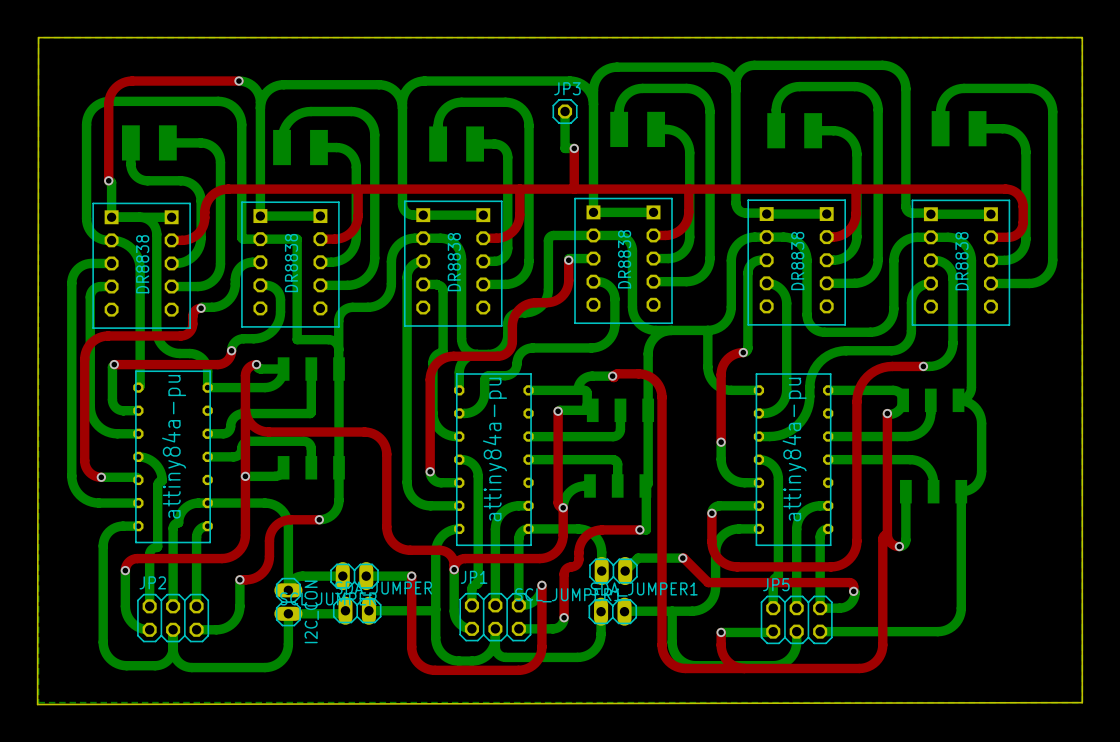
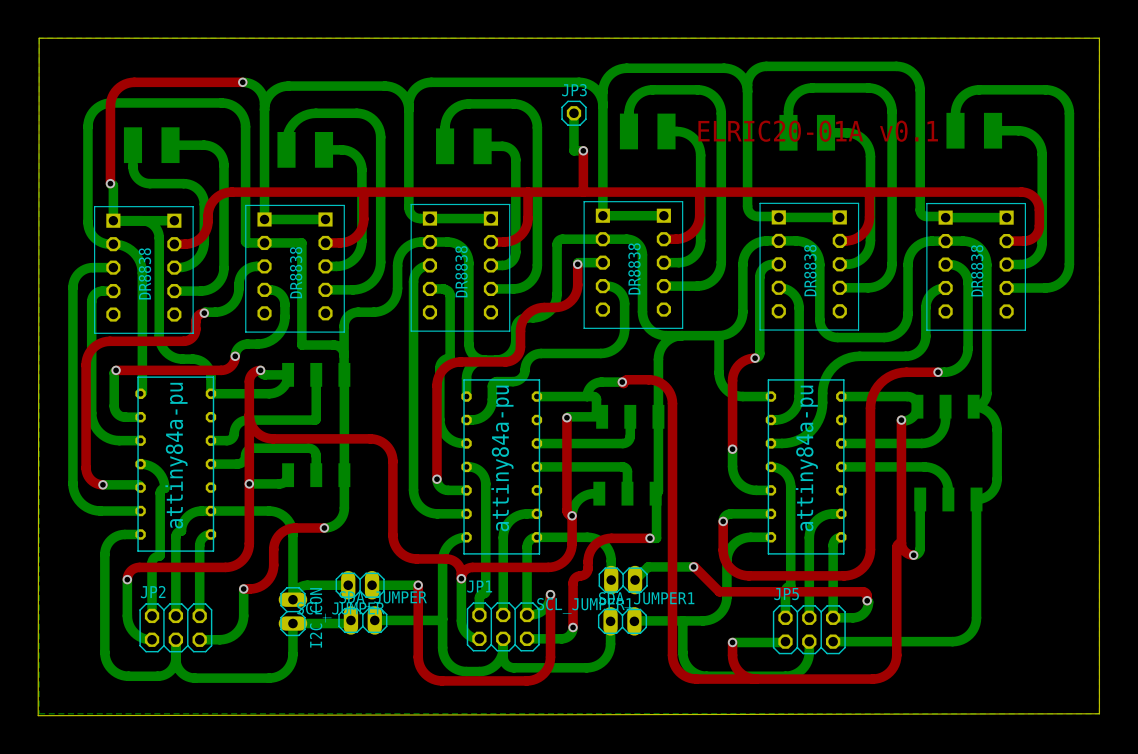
text: none -> ELRIC20-01A v0.1 (818, 131)

